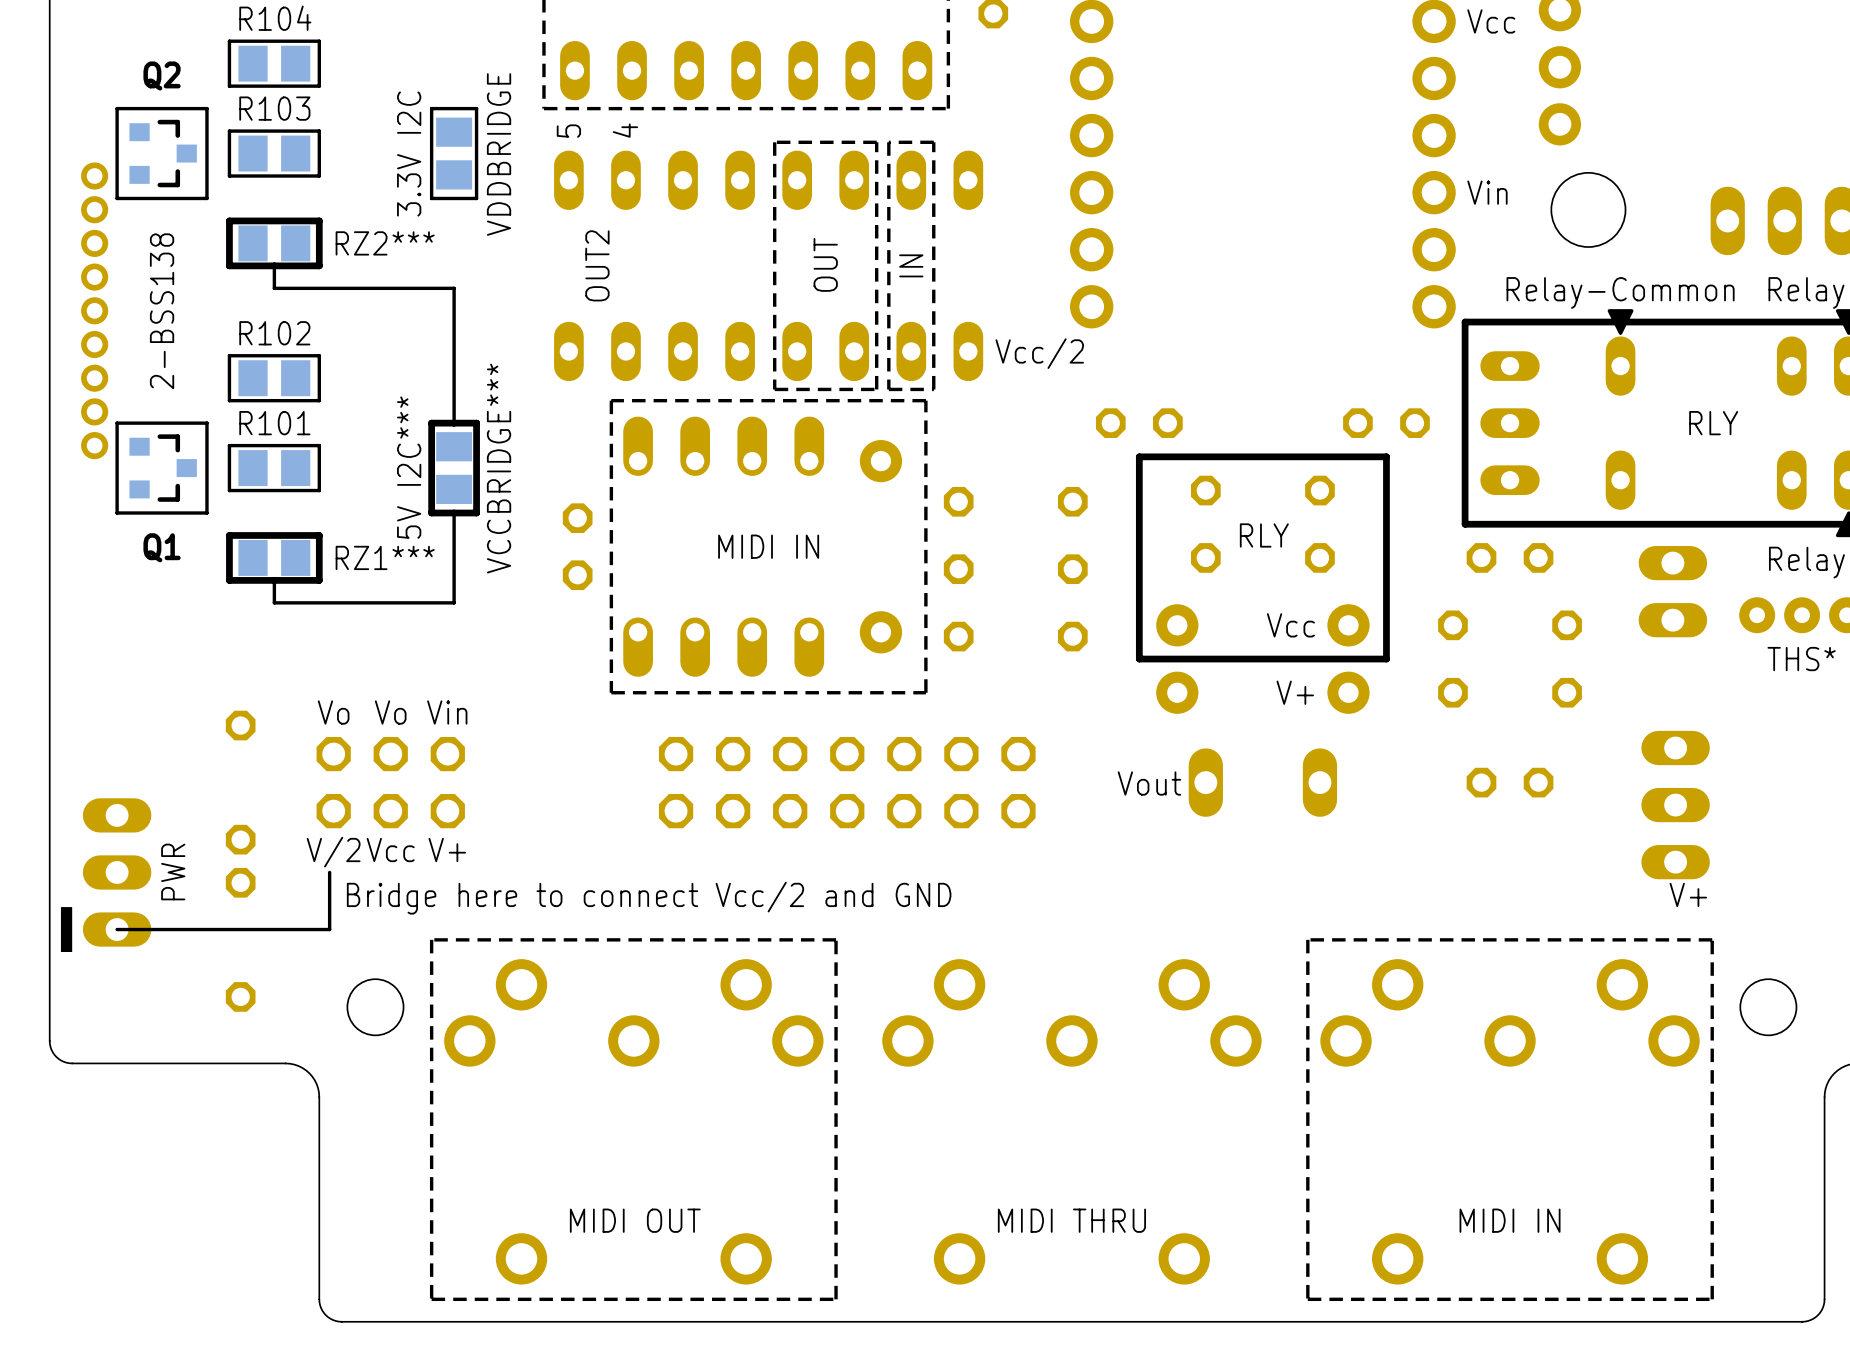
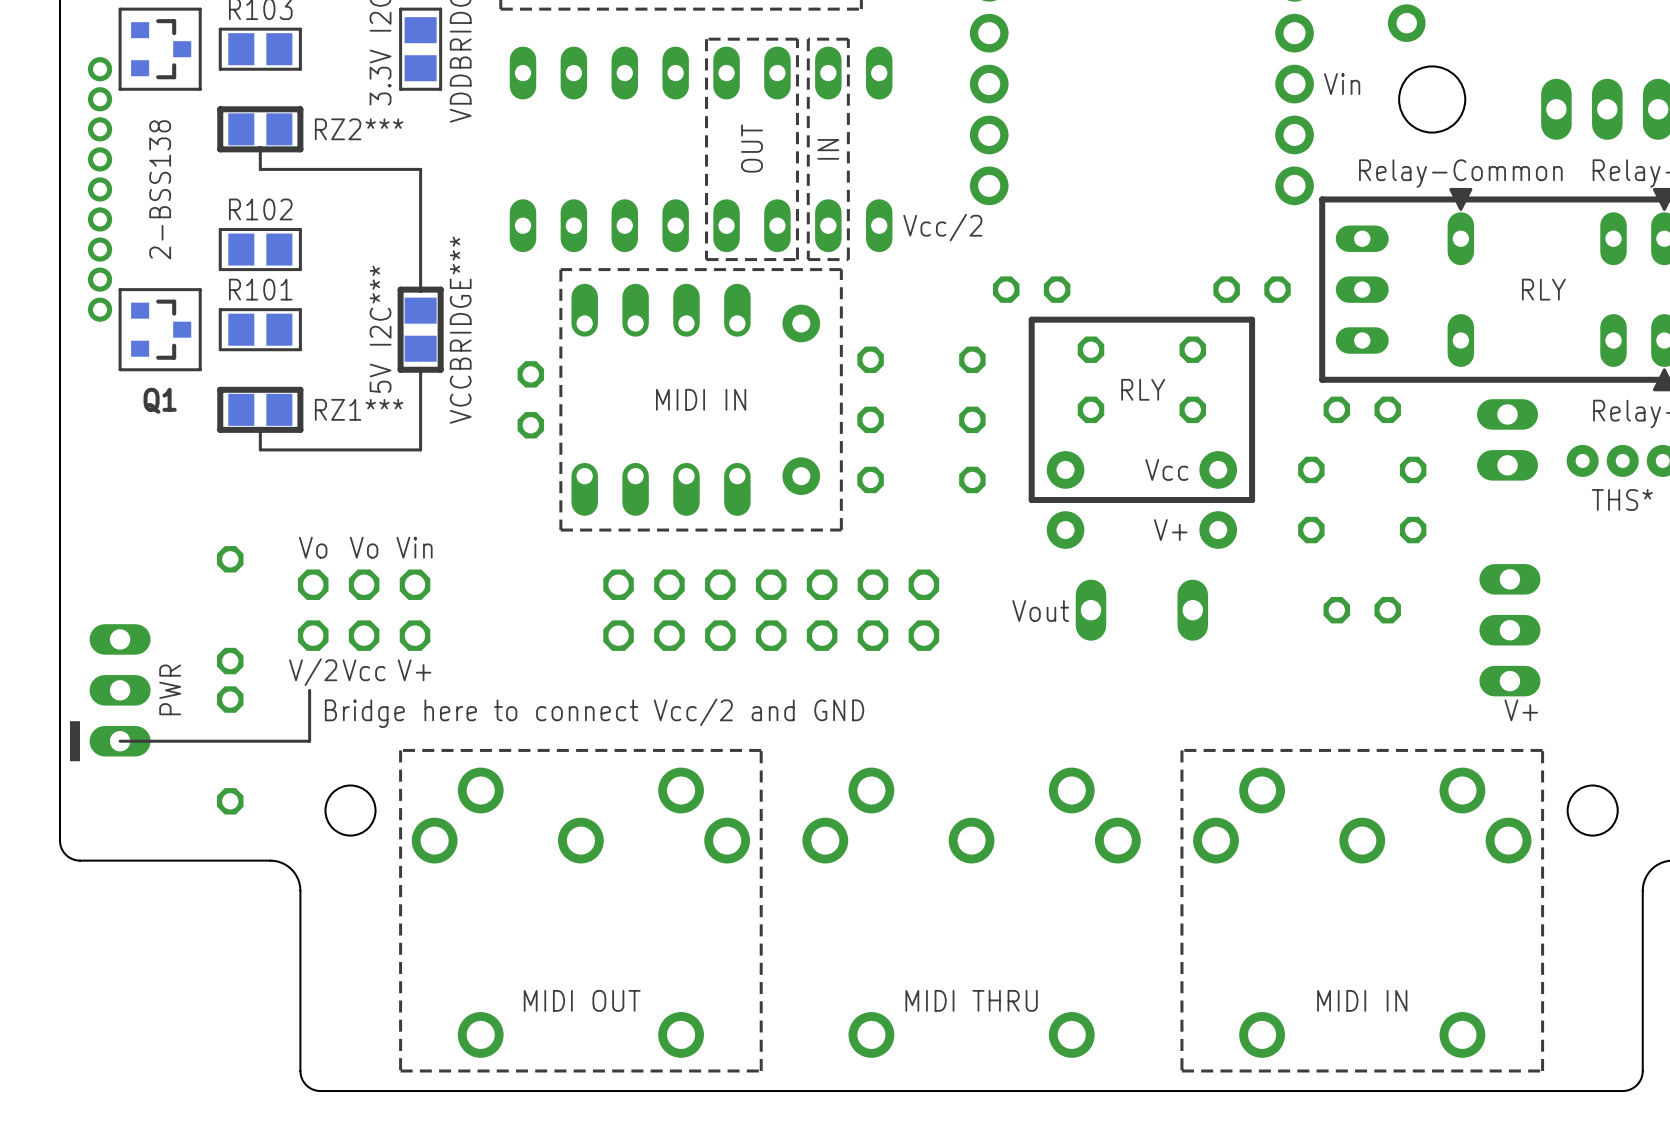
text: 4 (625, 130) -> none
text: 5 (568, 131) -> none
text: OUT2 (597, 265) -> none

